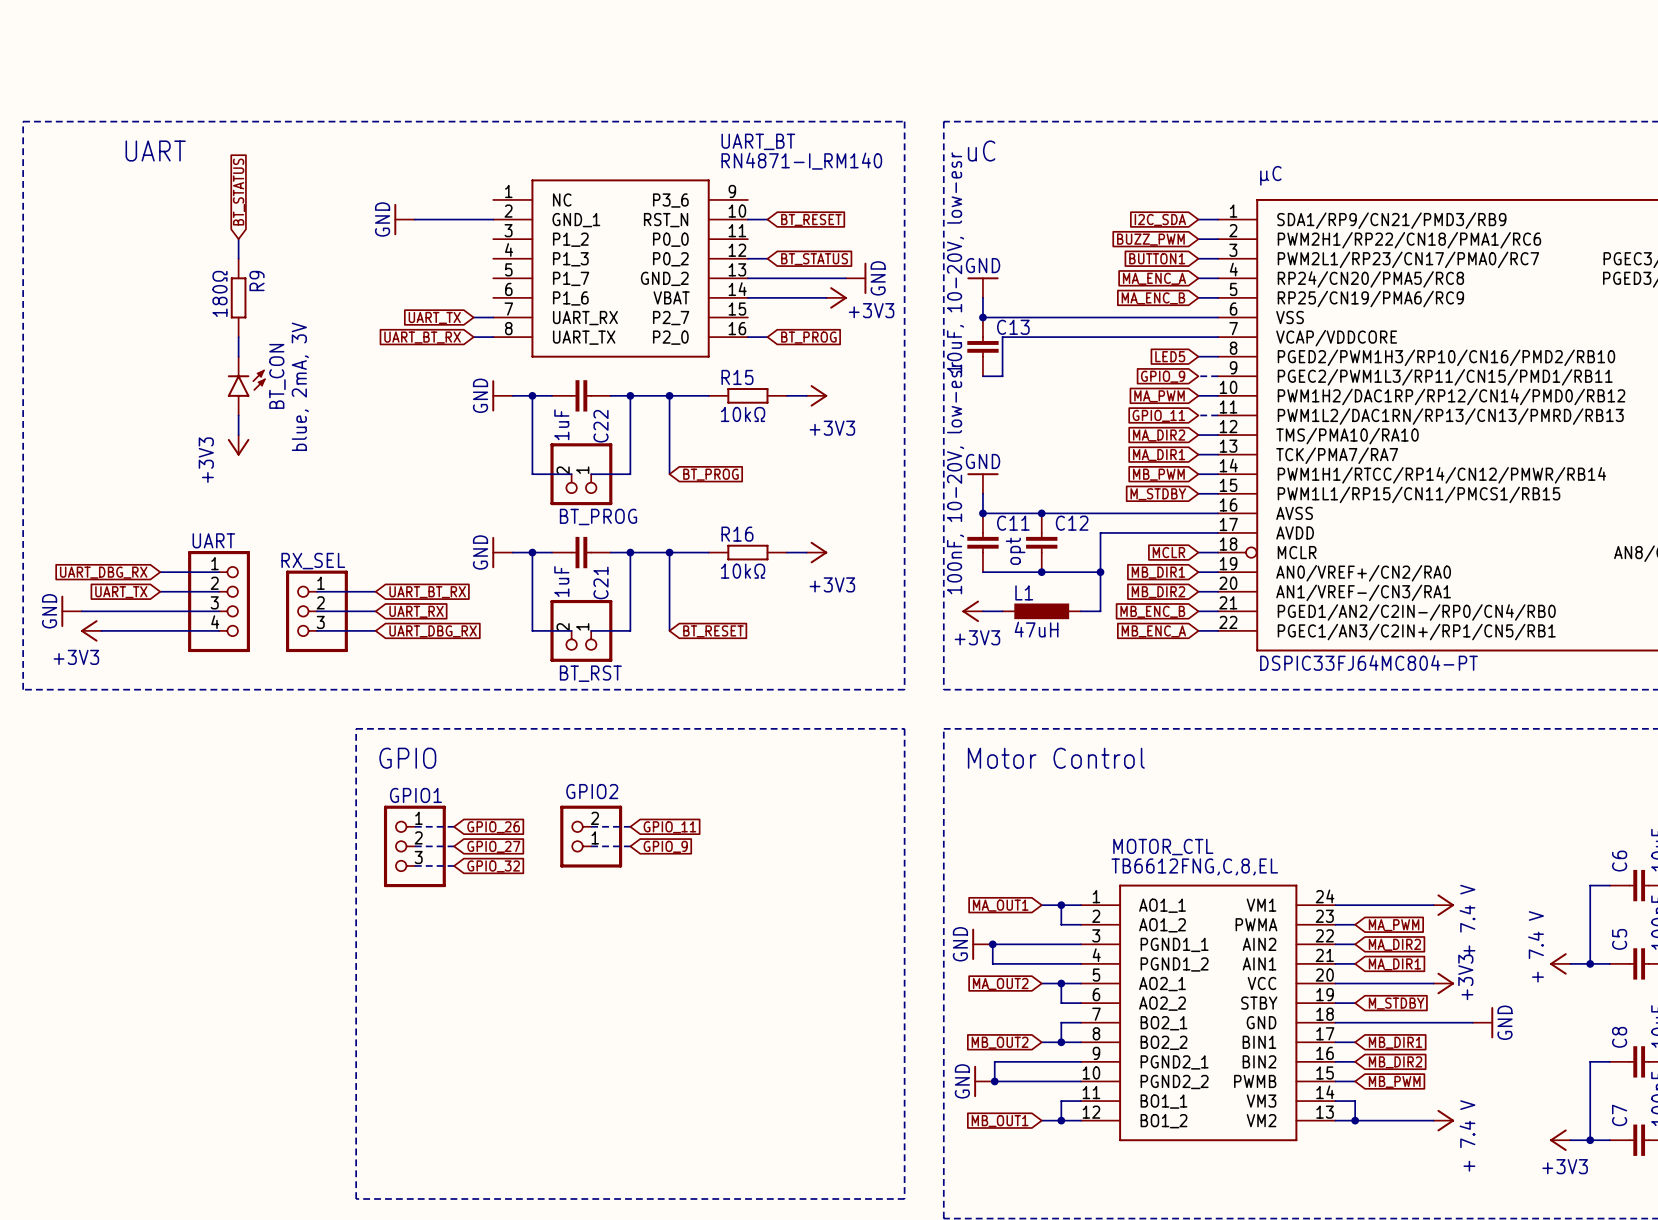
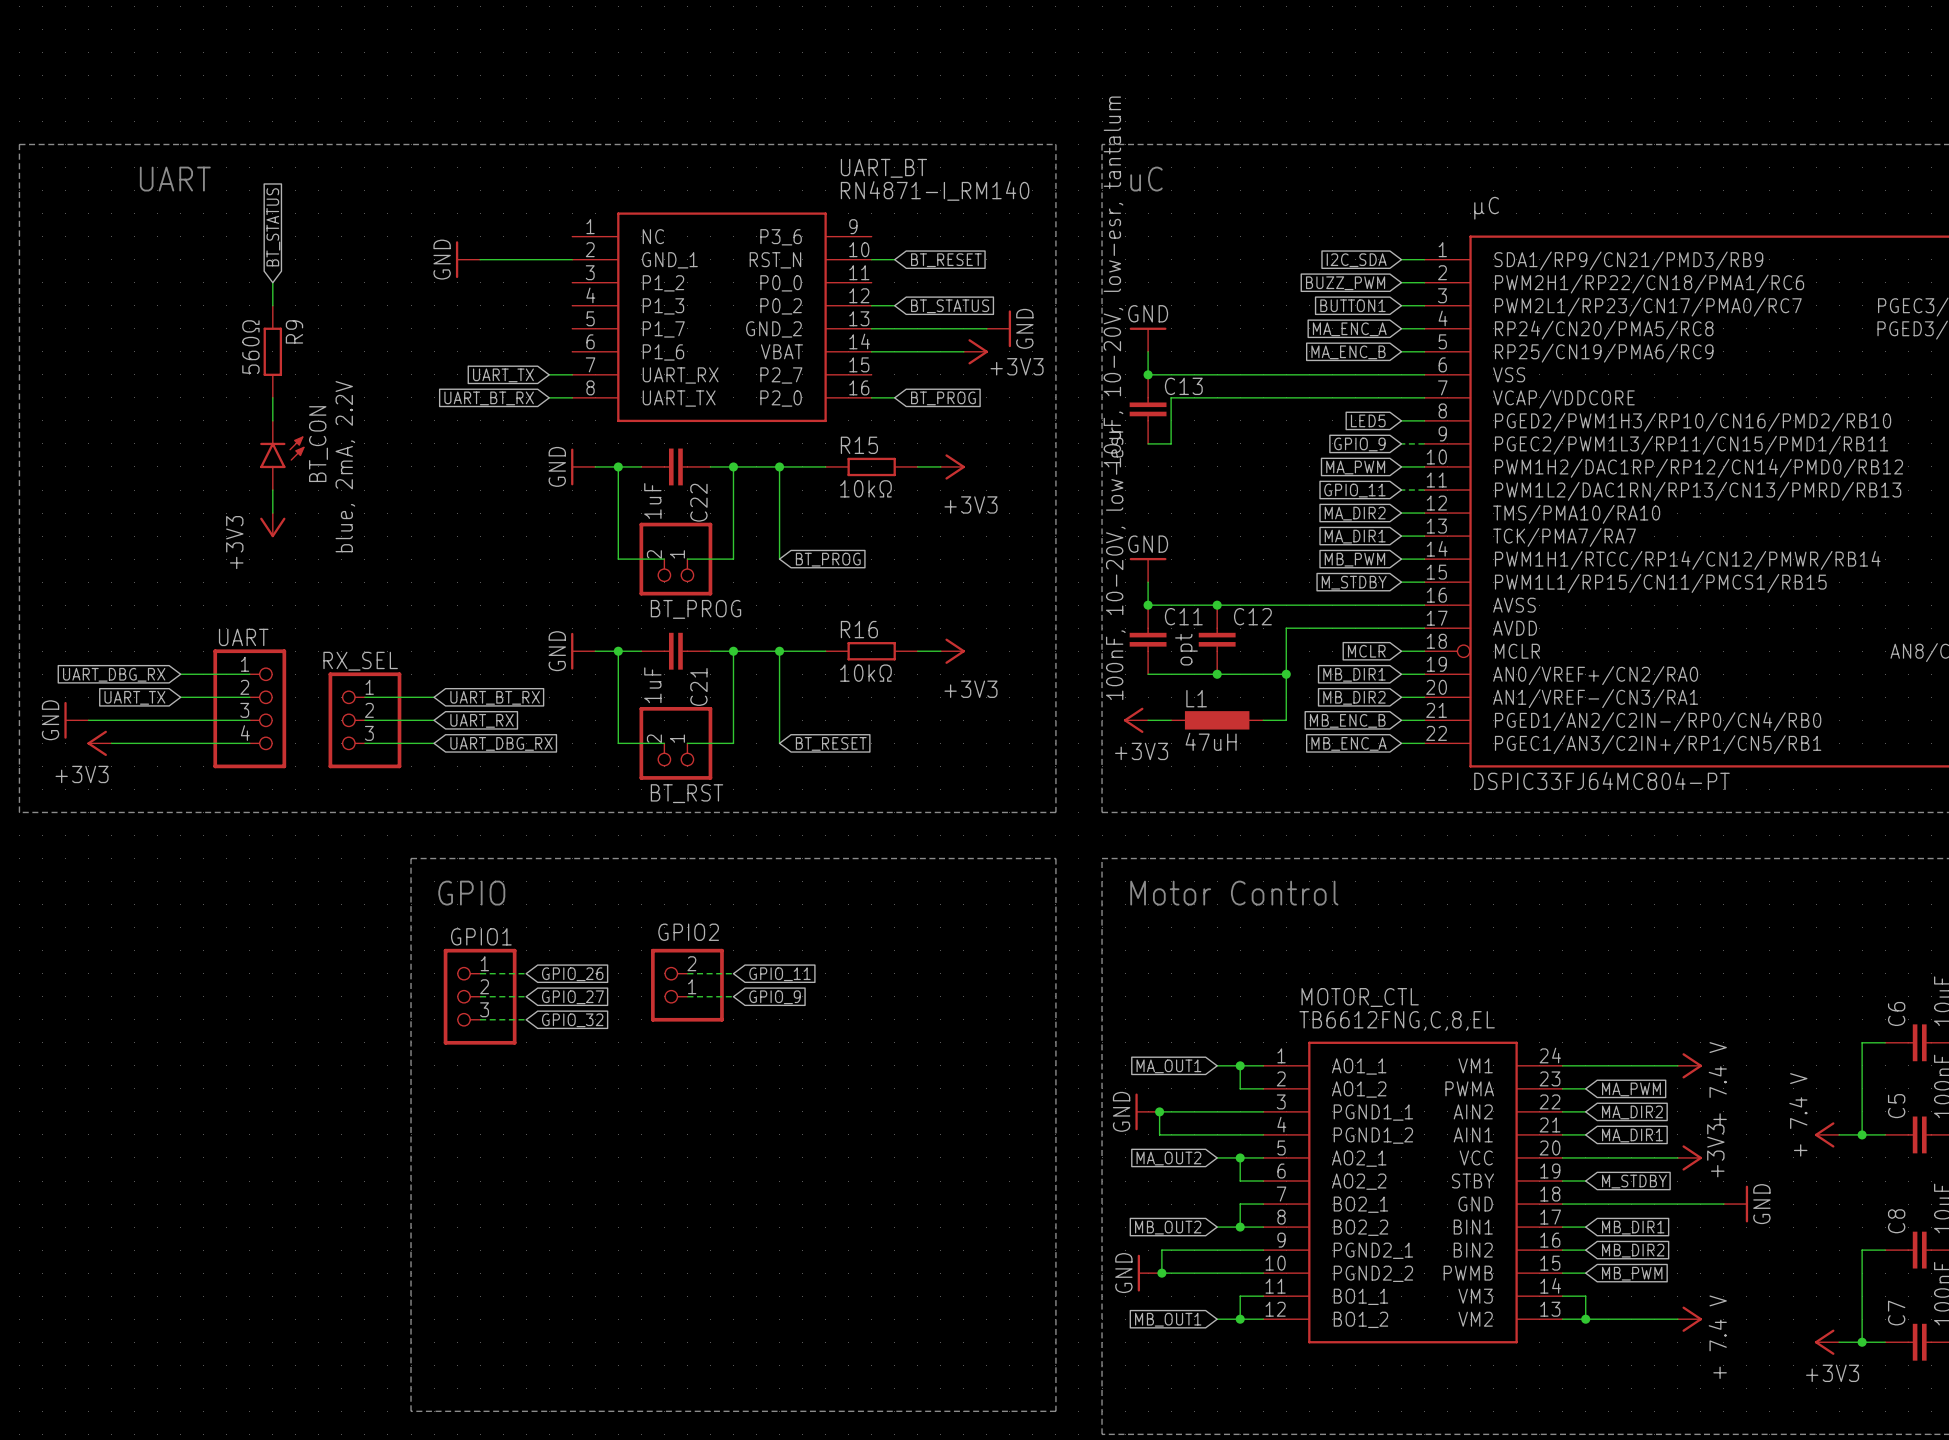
C13 value: 10uF, 10-20V, low-esr (955, 262) -> 10uF, 10-20V, low-esr, tantalum (1113, 281)
R9 value: 180Ω (219, 293) -> 560Ω (250, 347)
BT_CON value: blue, 2mA, 3V (300, 386) -> blue, 2mA, 2.2V (345, 466)

